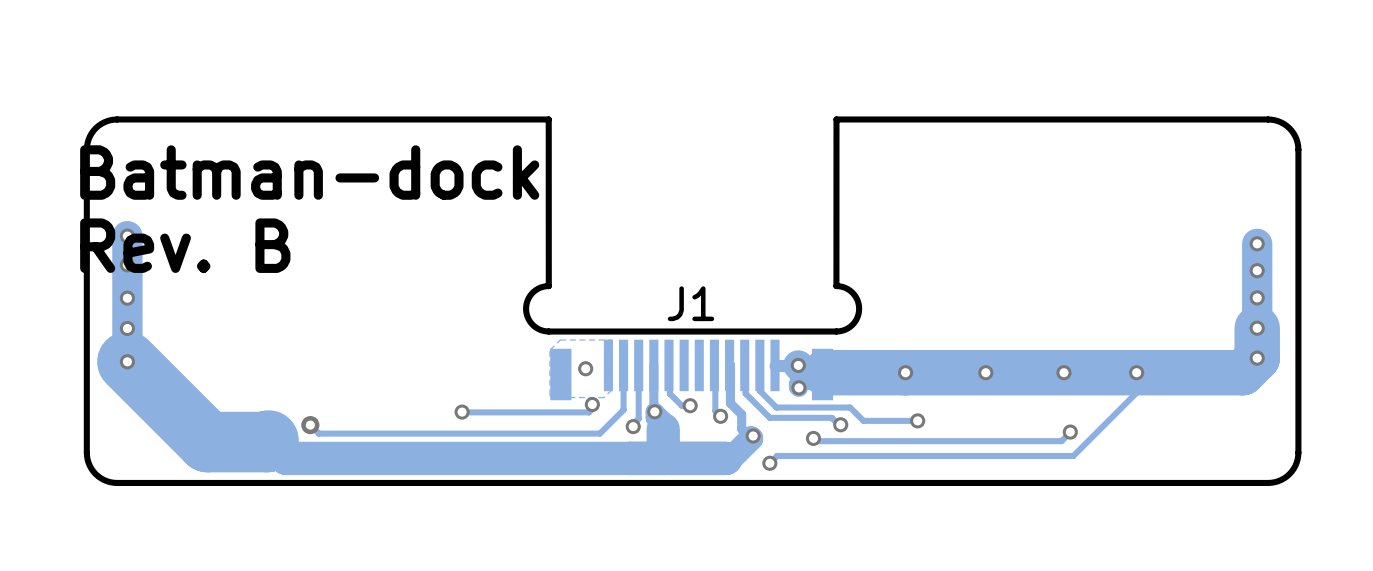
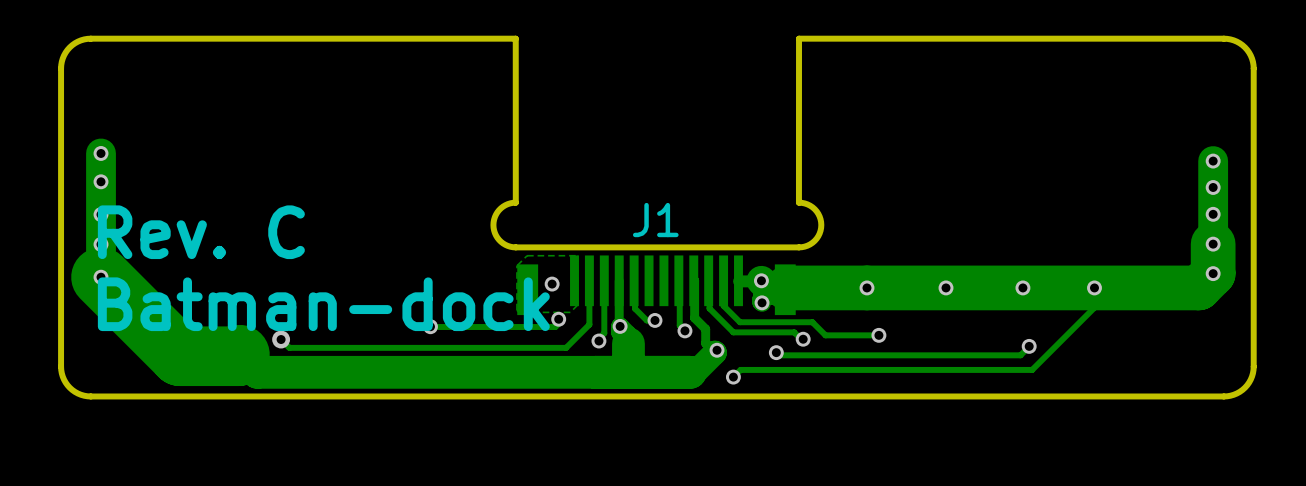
text position: Batman-dock (309, 172) -> Batman-dock (323, 304)
text: Rev. B (185, 245) -> Rev. C (201, 232)

